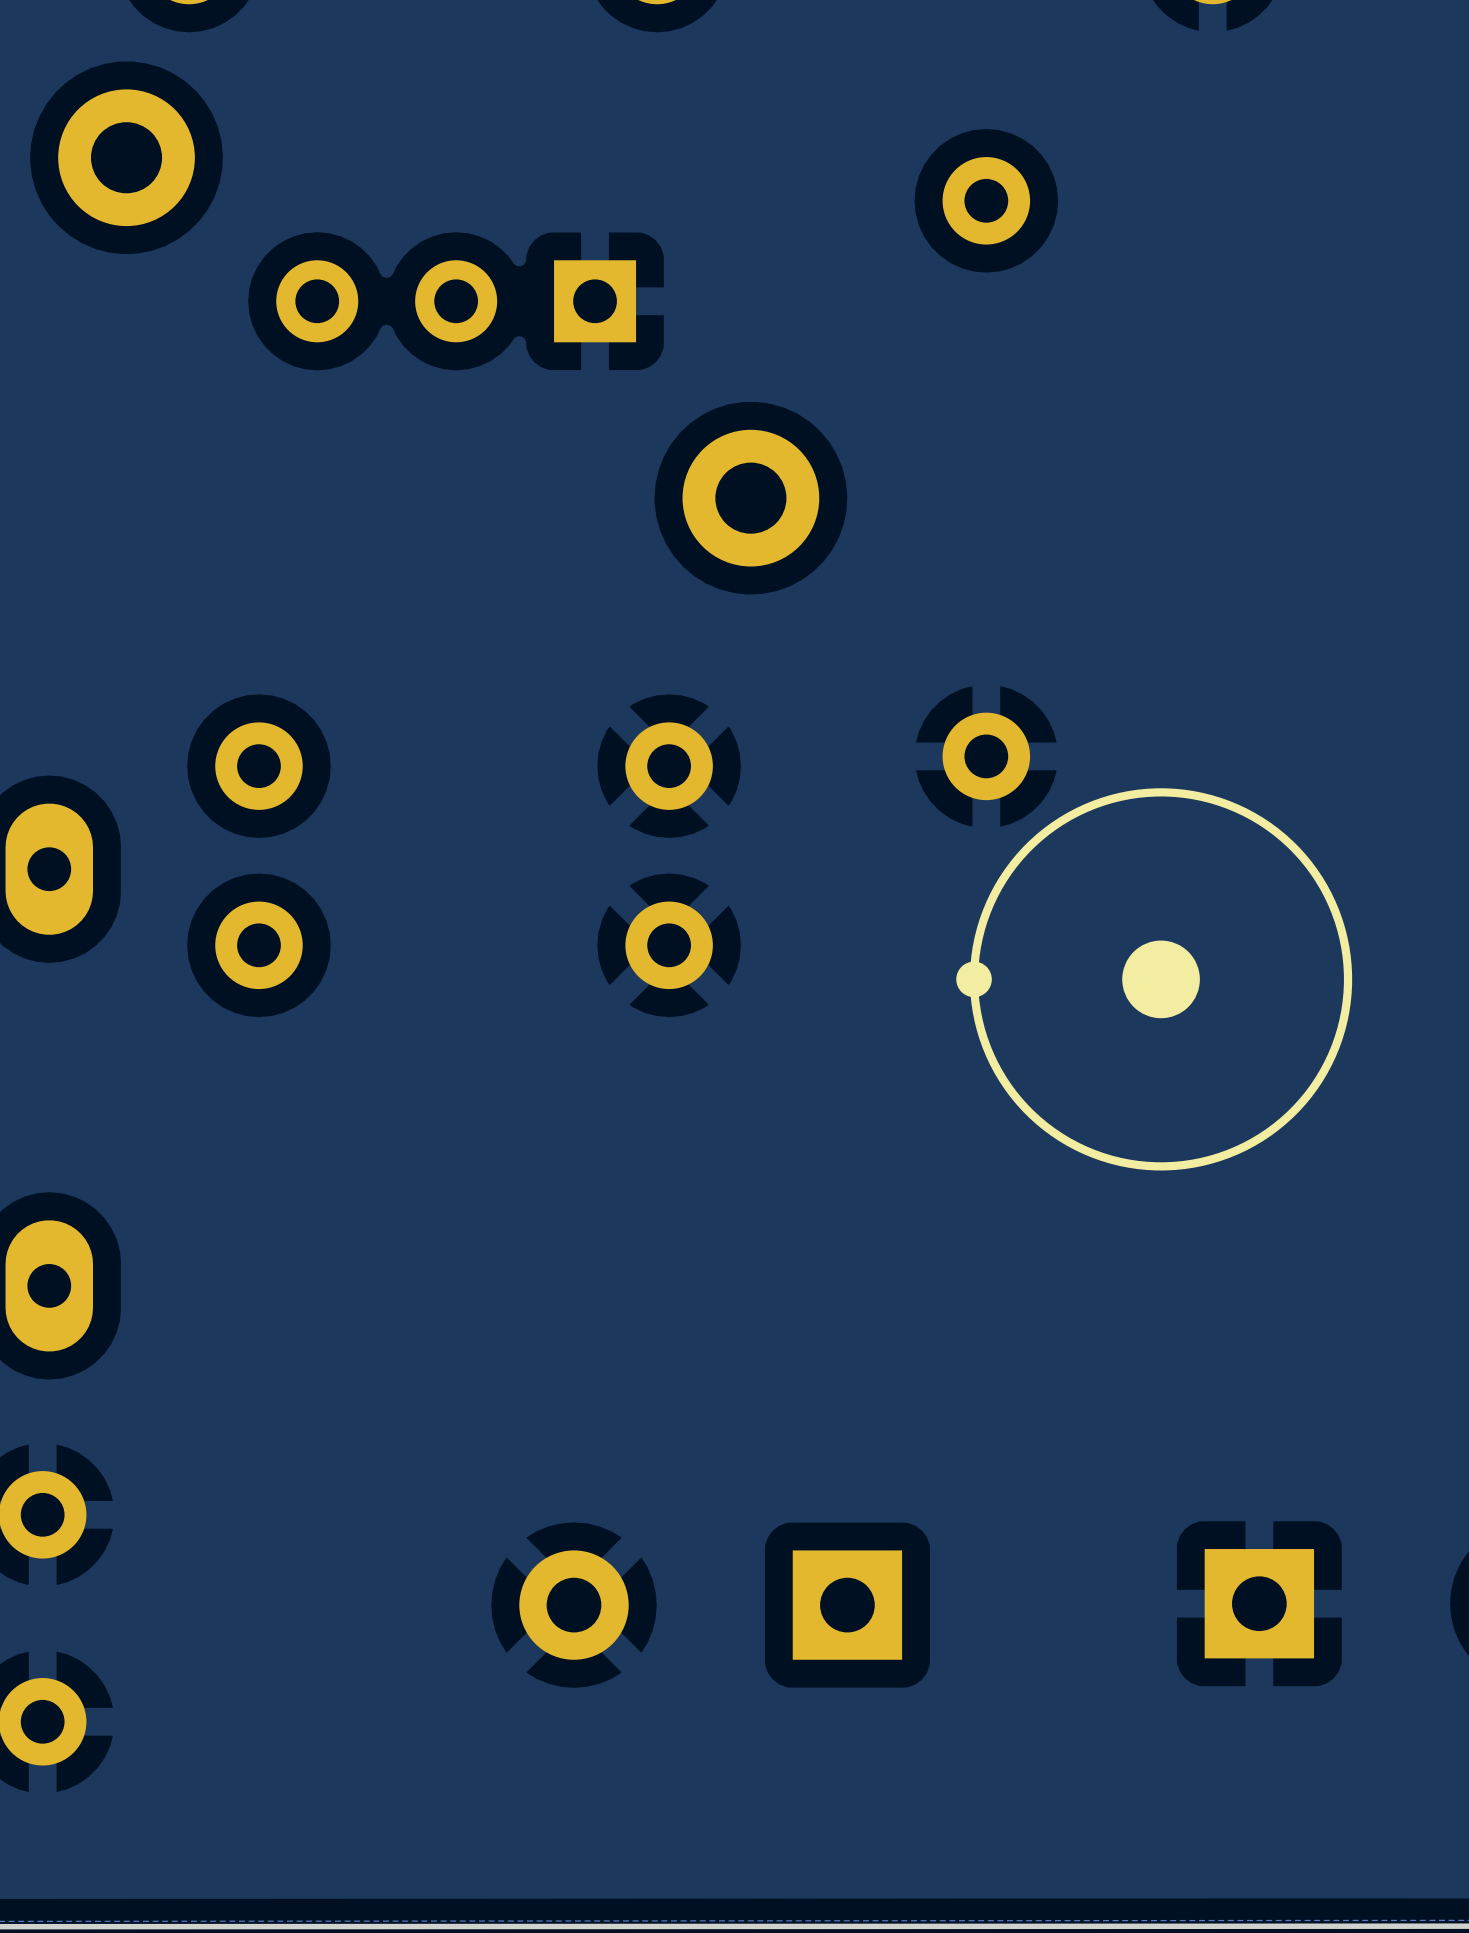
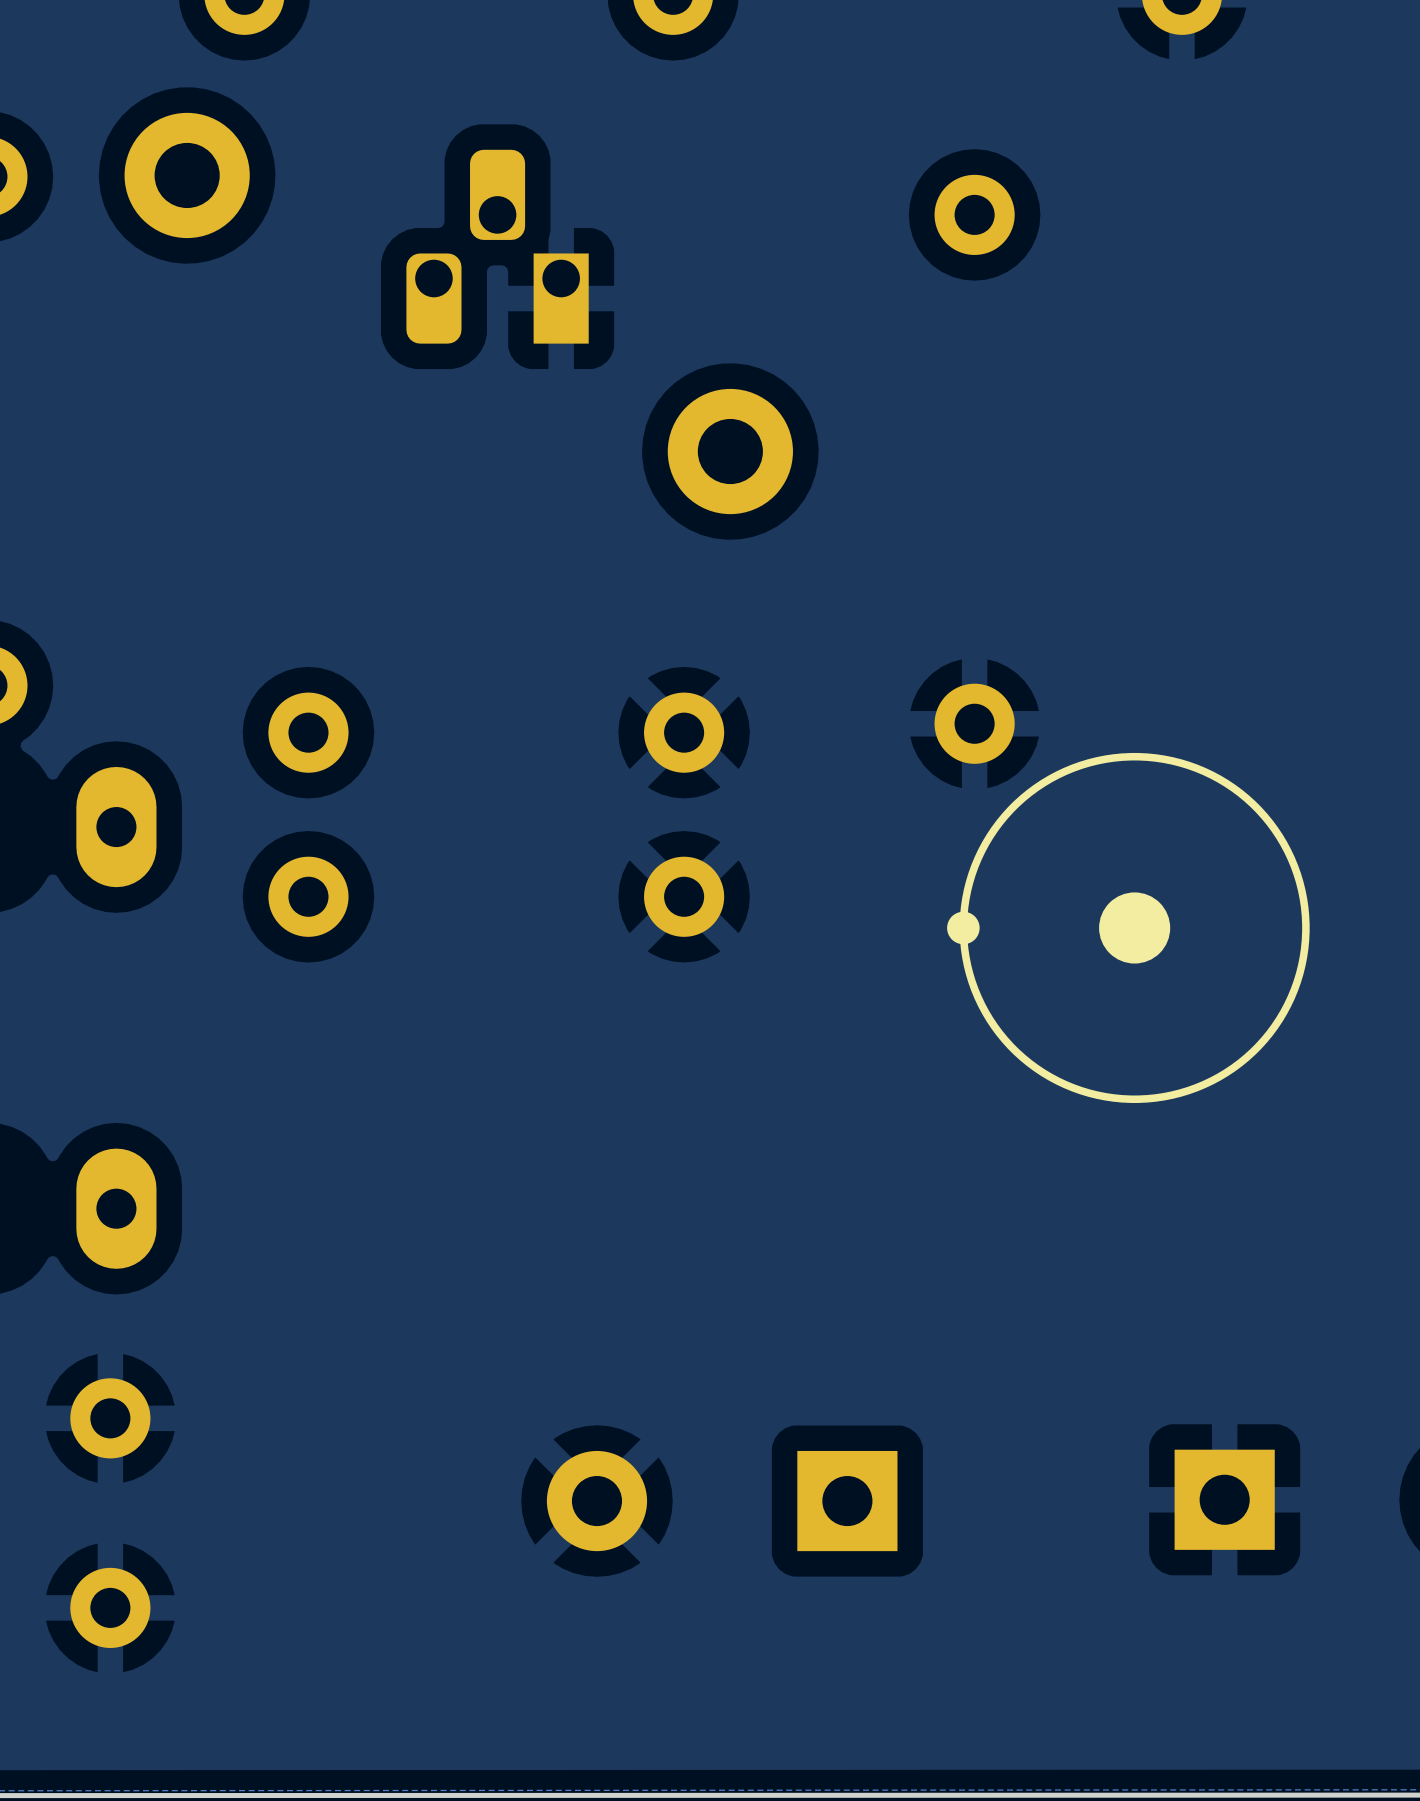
part: none -> (497, 246)
part: (456, 301) -> none
part position: (750, 498) -> (730, 451)

